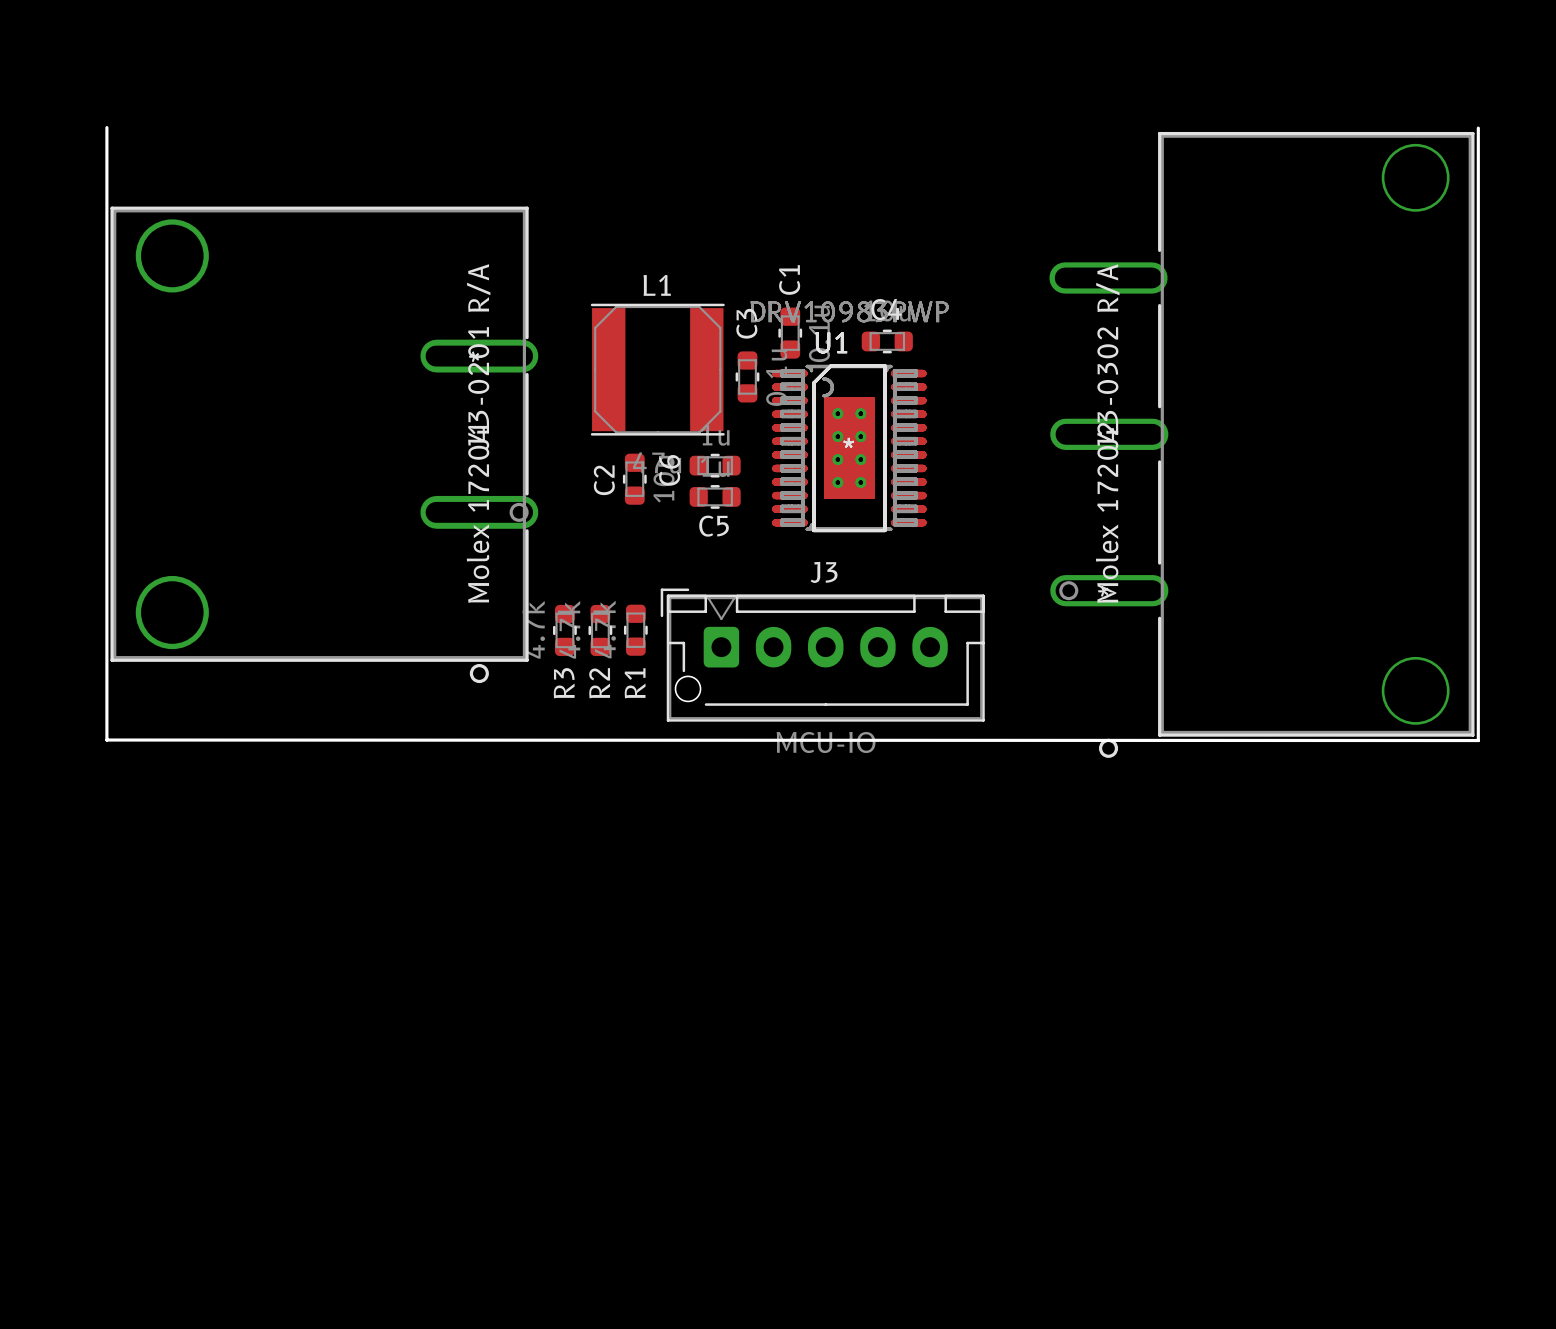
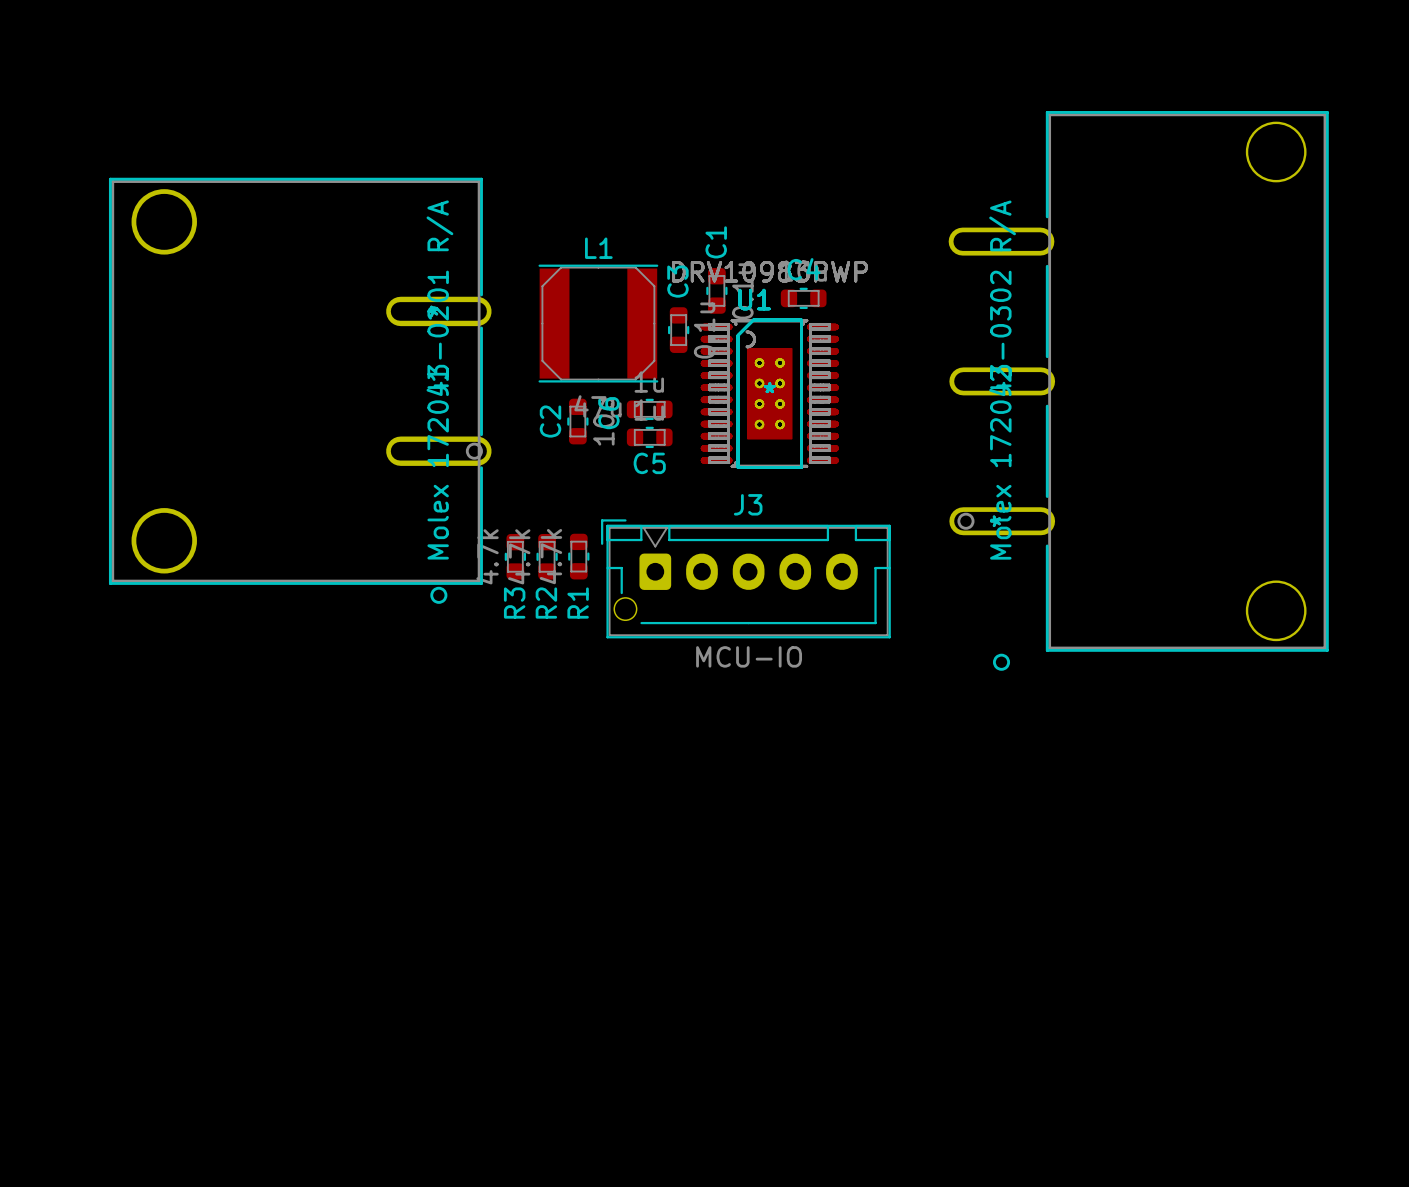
board edge: (106, 127) (106, 740) (1478, 740) (1478, 128) -> none

